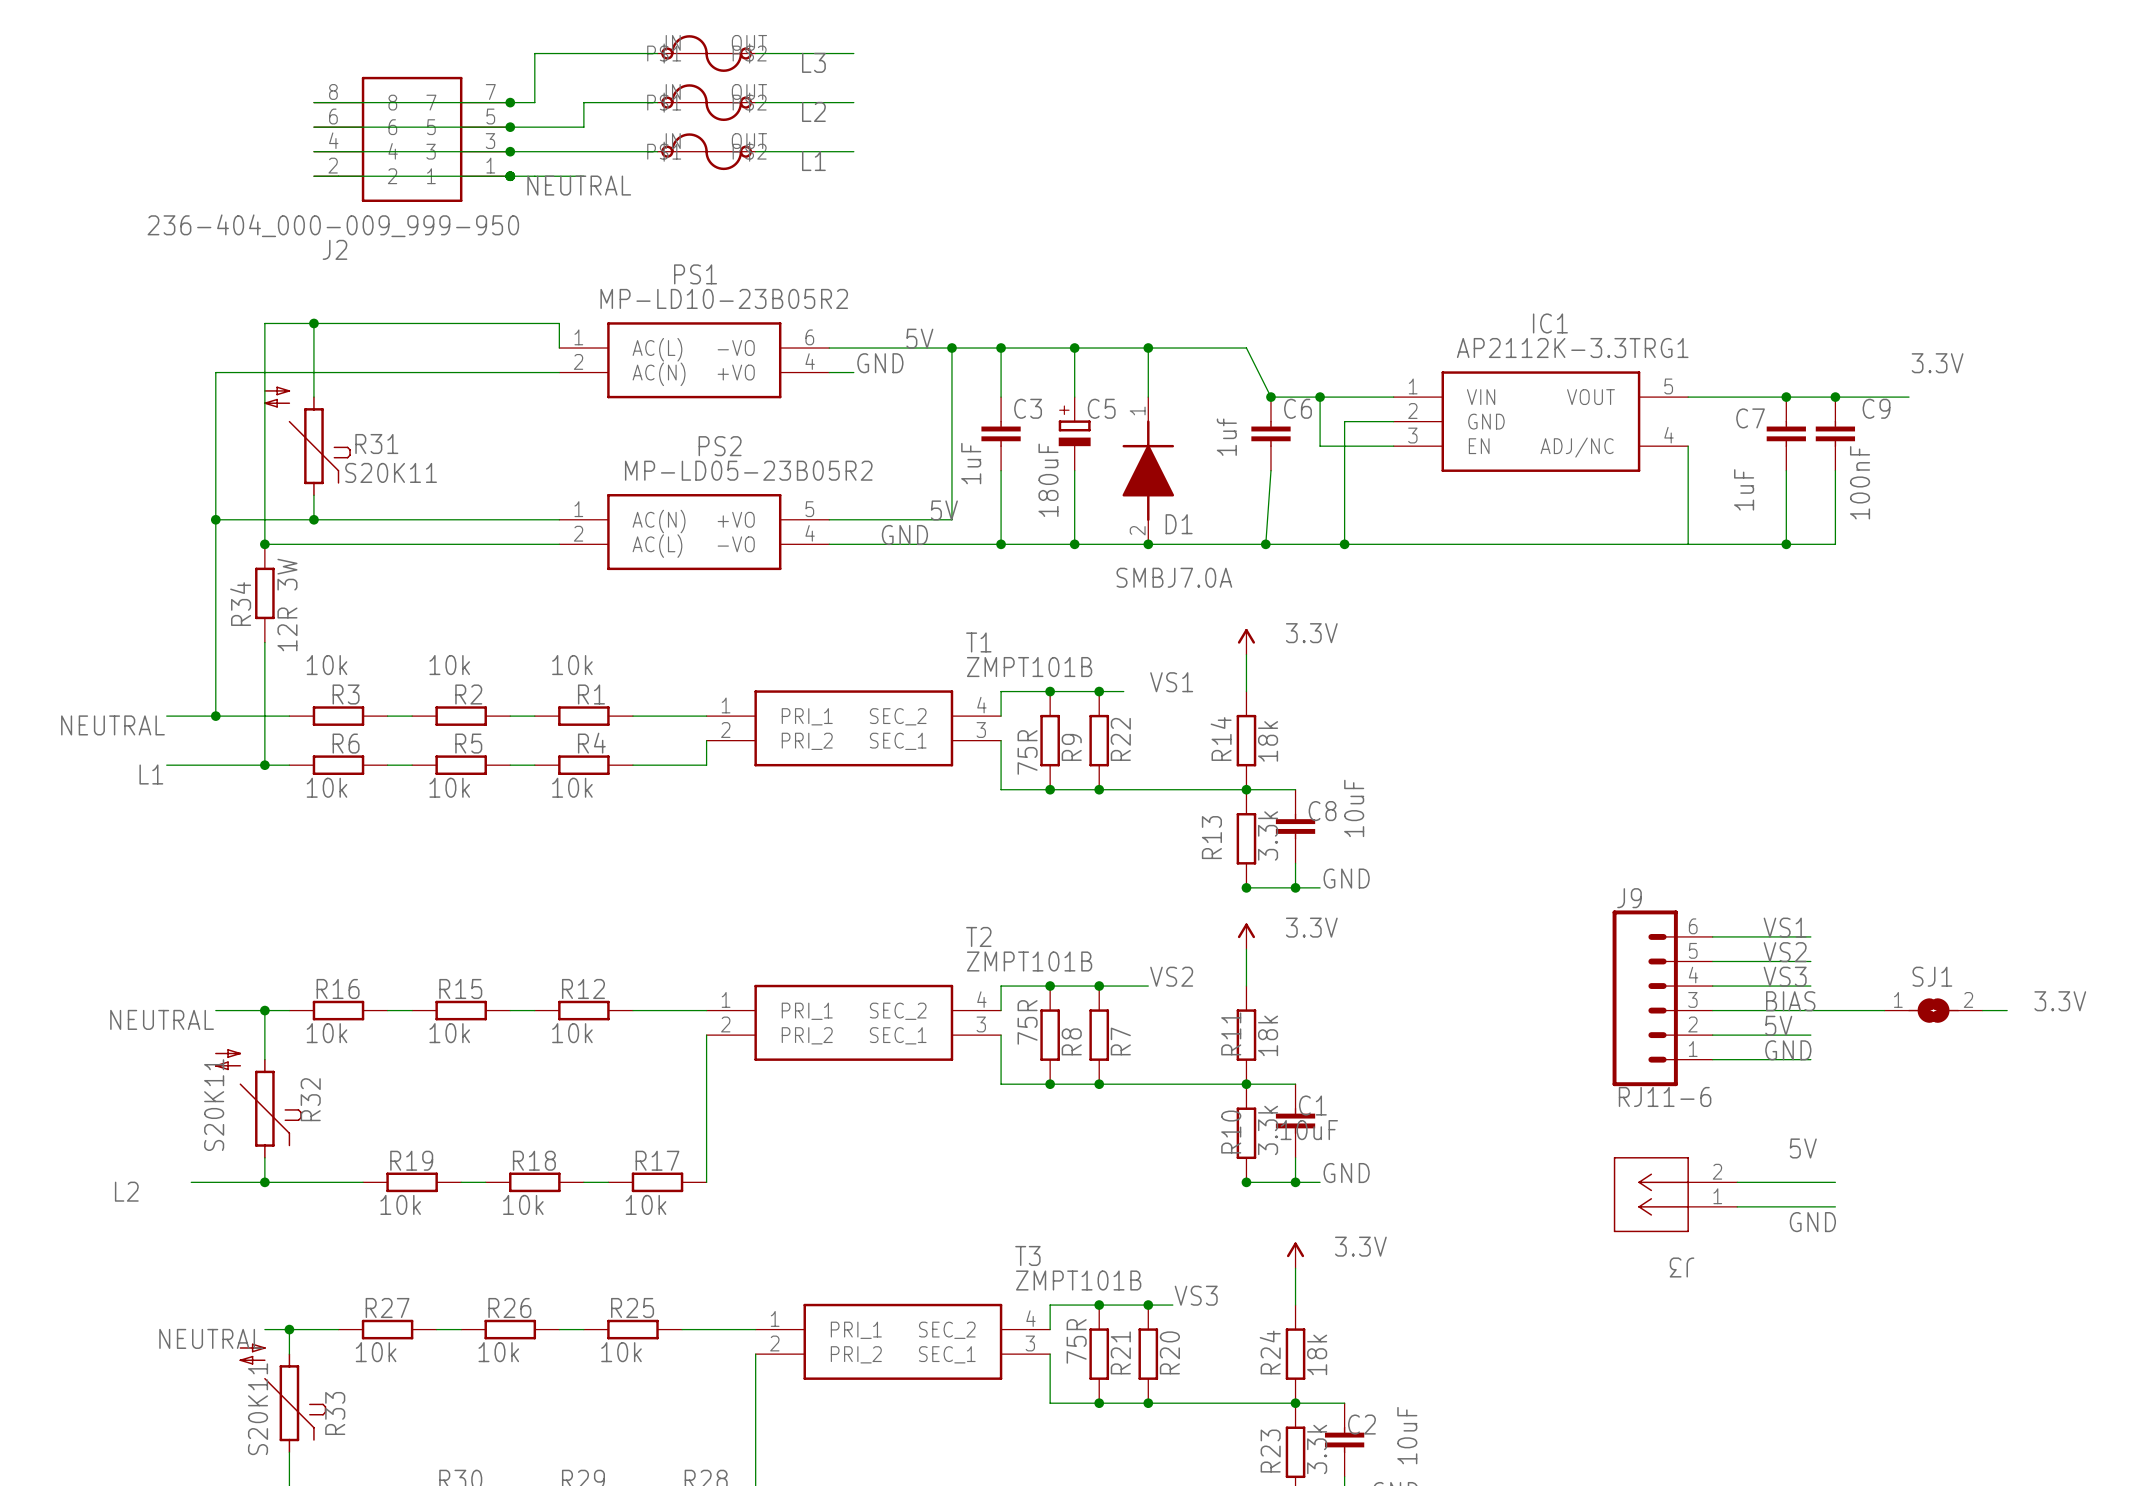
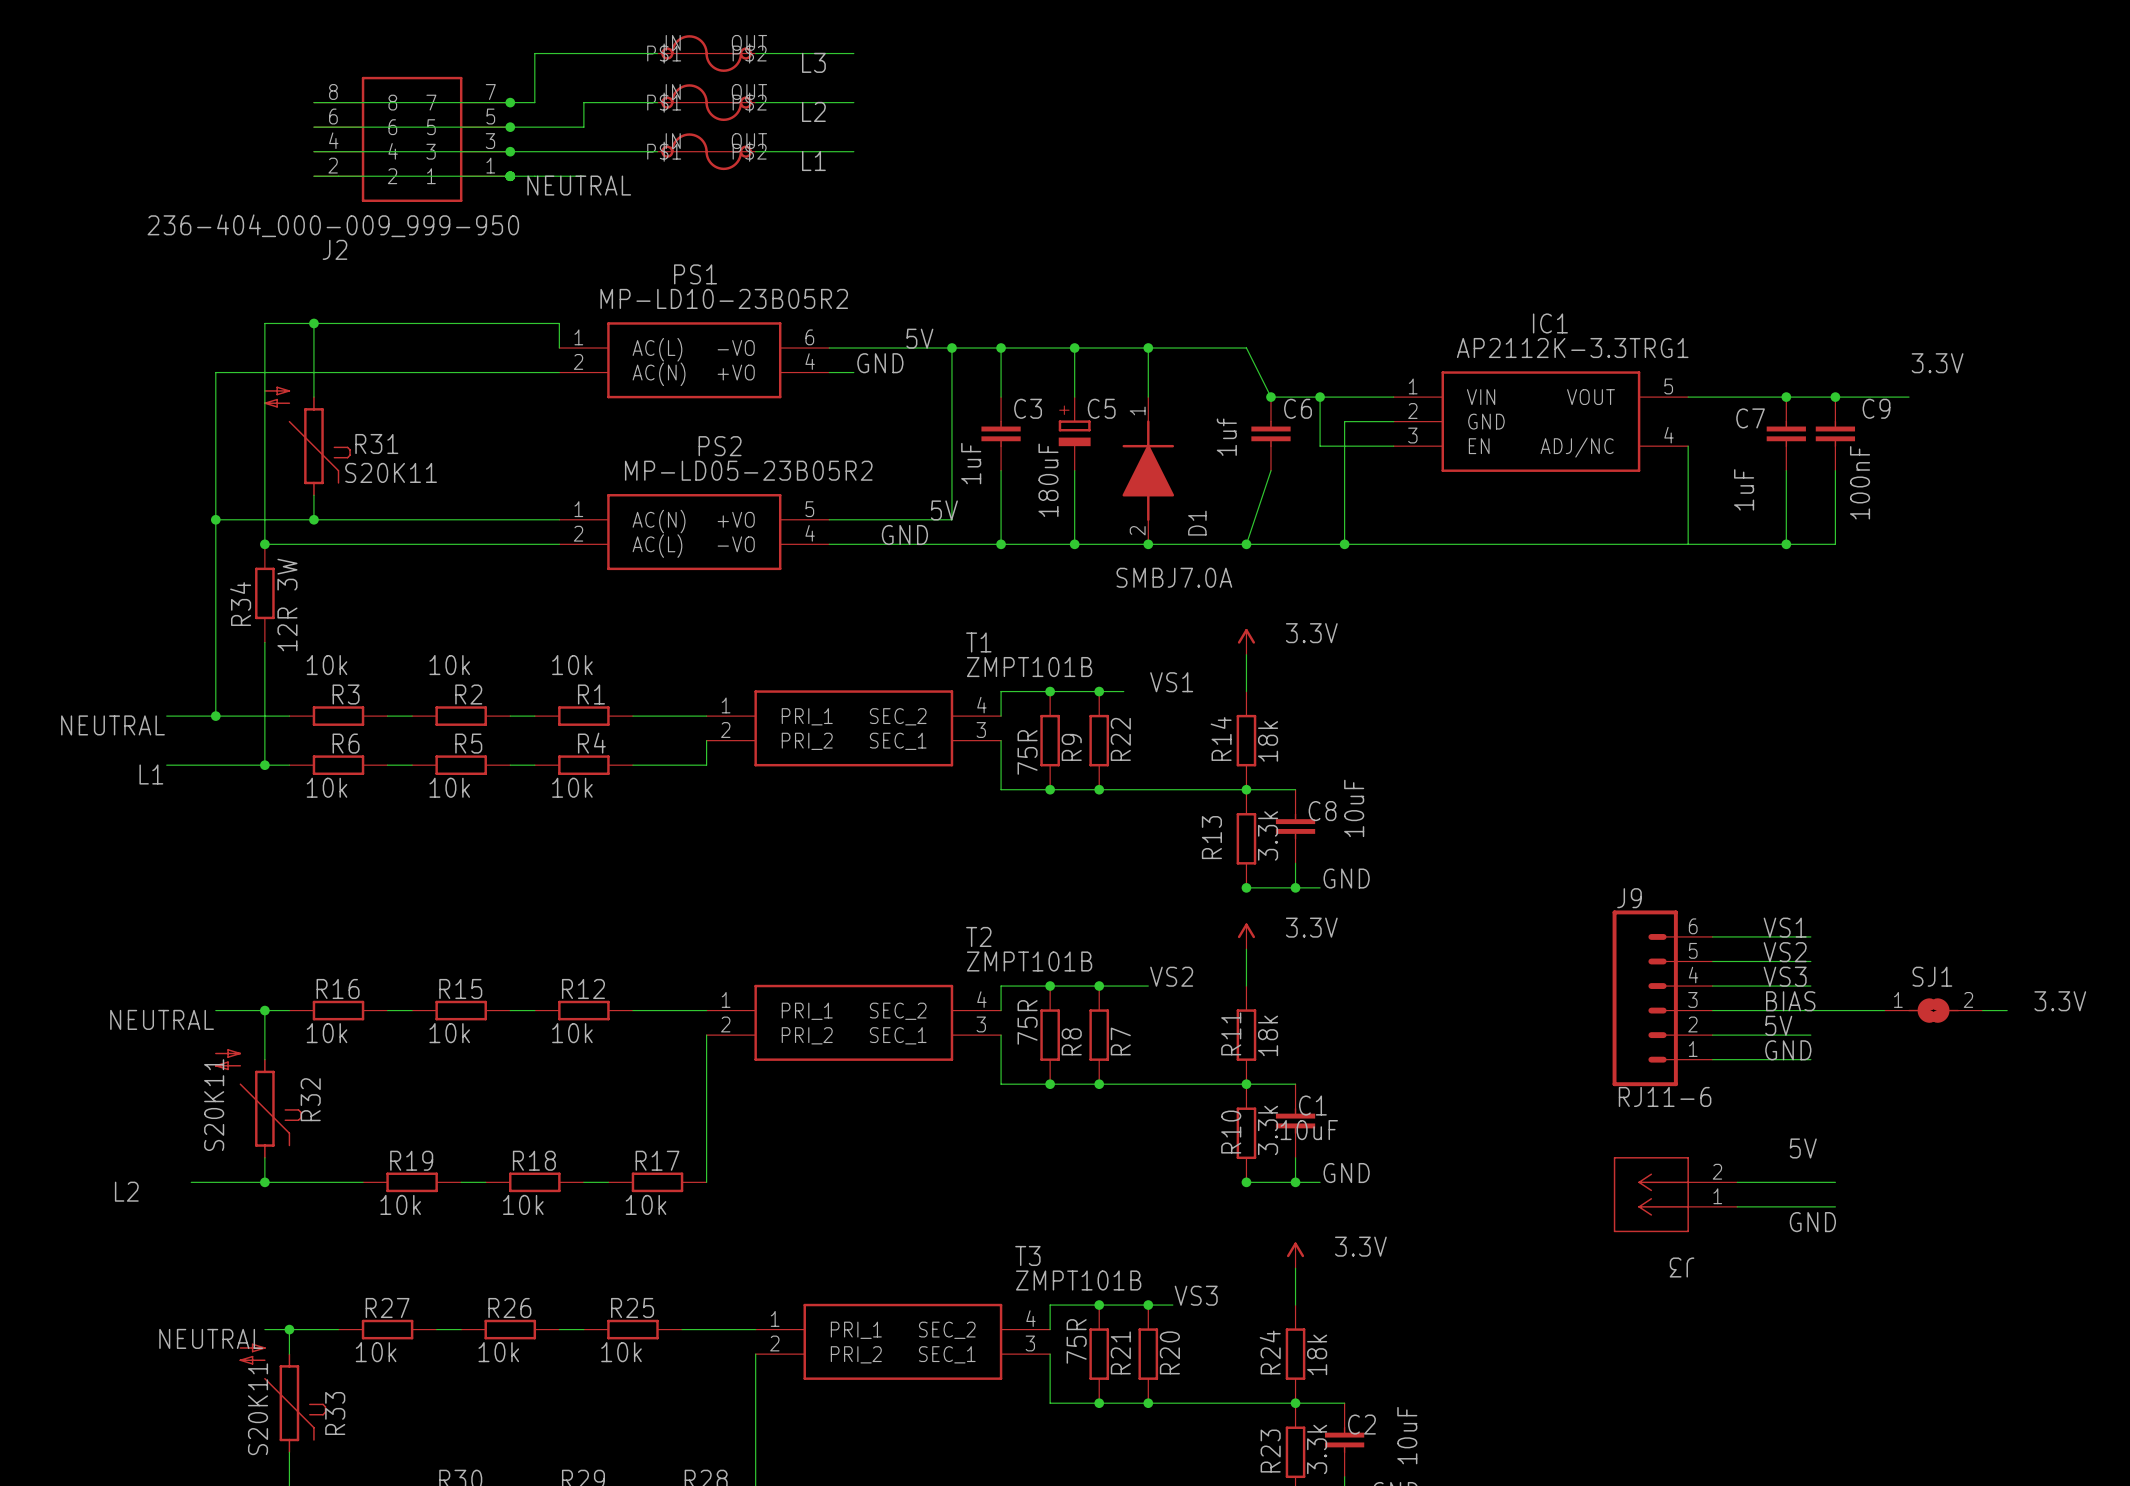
wire: (1270, 470) (1265, 544) -> (1270, 470) (1246, 544)
D1 name rotation: 0° (1179, 524) -> 90° counterclockwise (1197, 523)
junction position: (1265, 544) -> (1246, 544)

